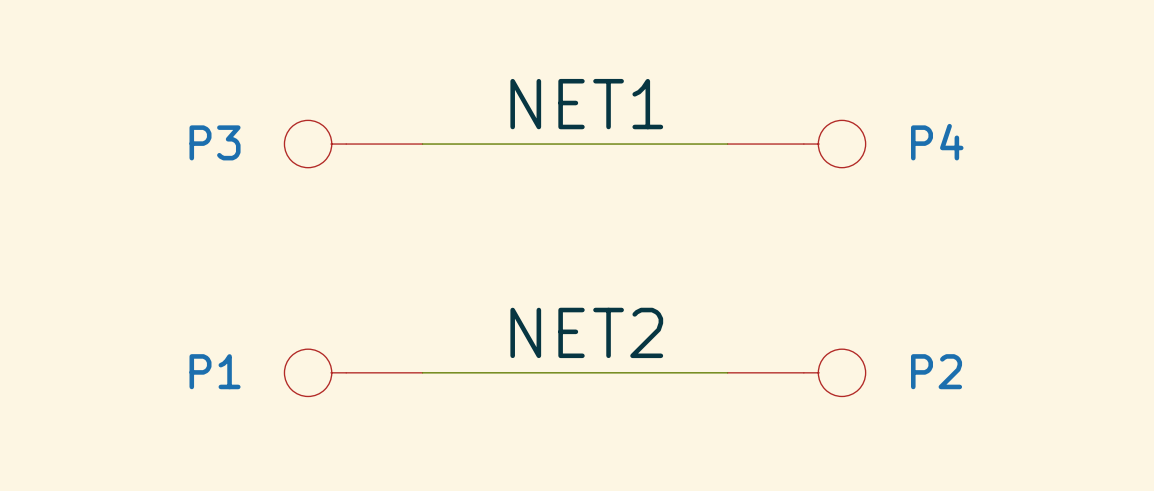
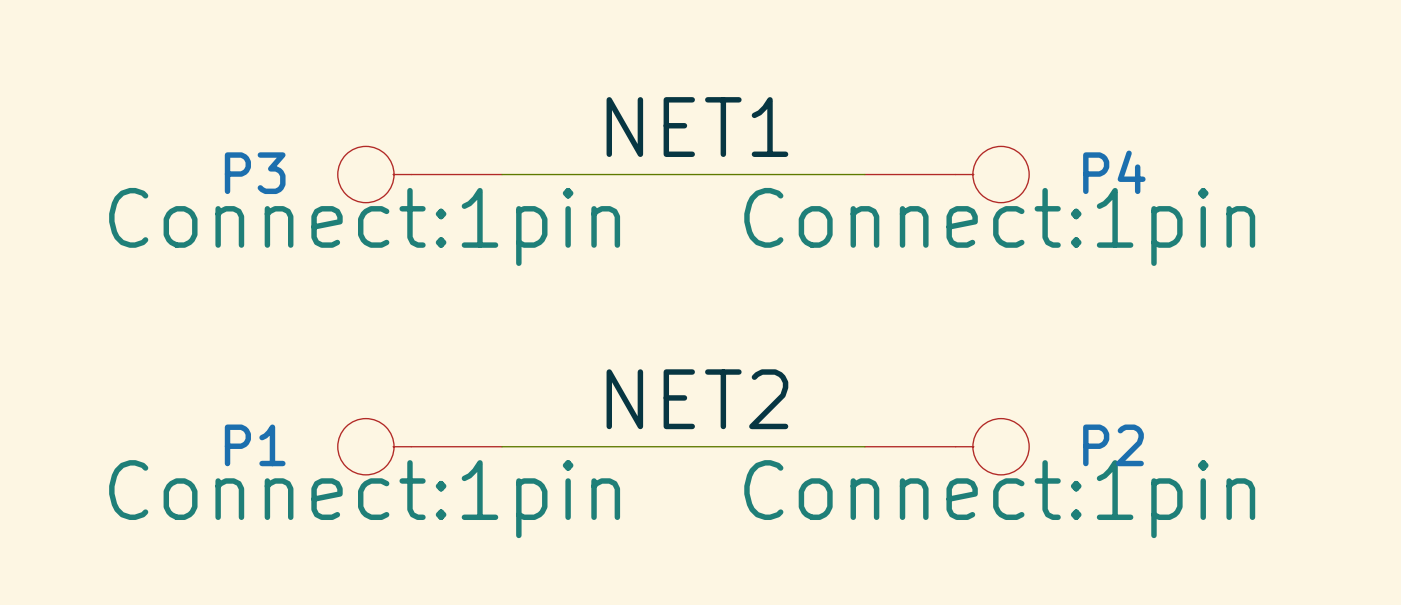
P3 text: none -> Connect:1pin (364, 226)
P4 text: none -> Connect:1pin (999, 226)
P1 text: none -> Connect:1pin (364, 499)
P2 text: none -> Connect:1pin (999, 499)

